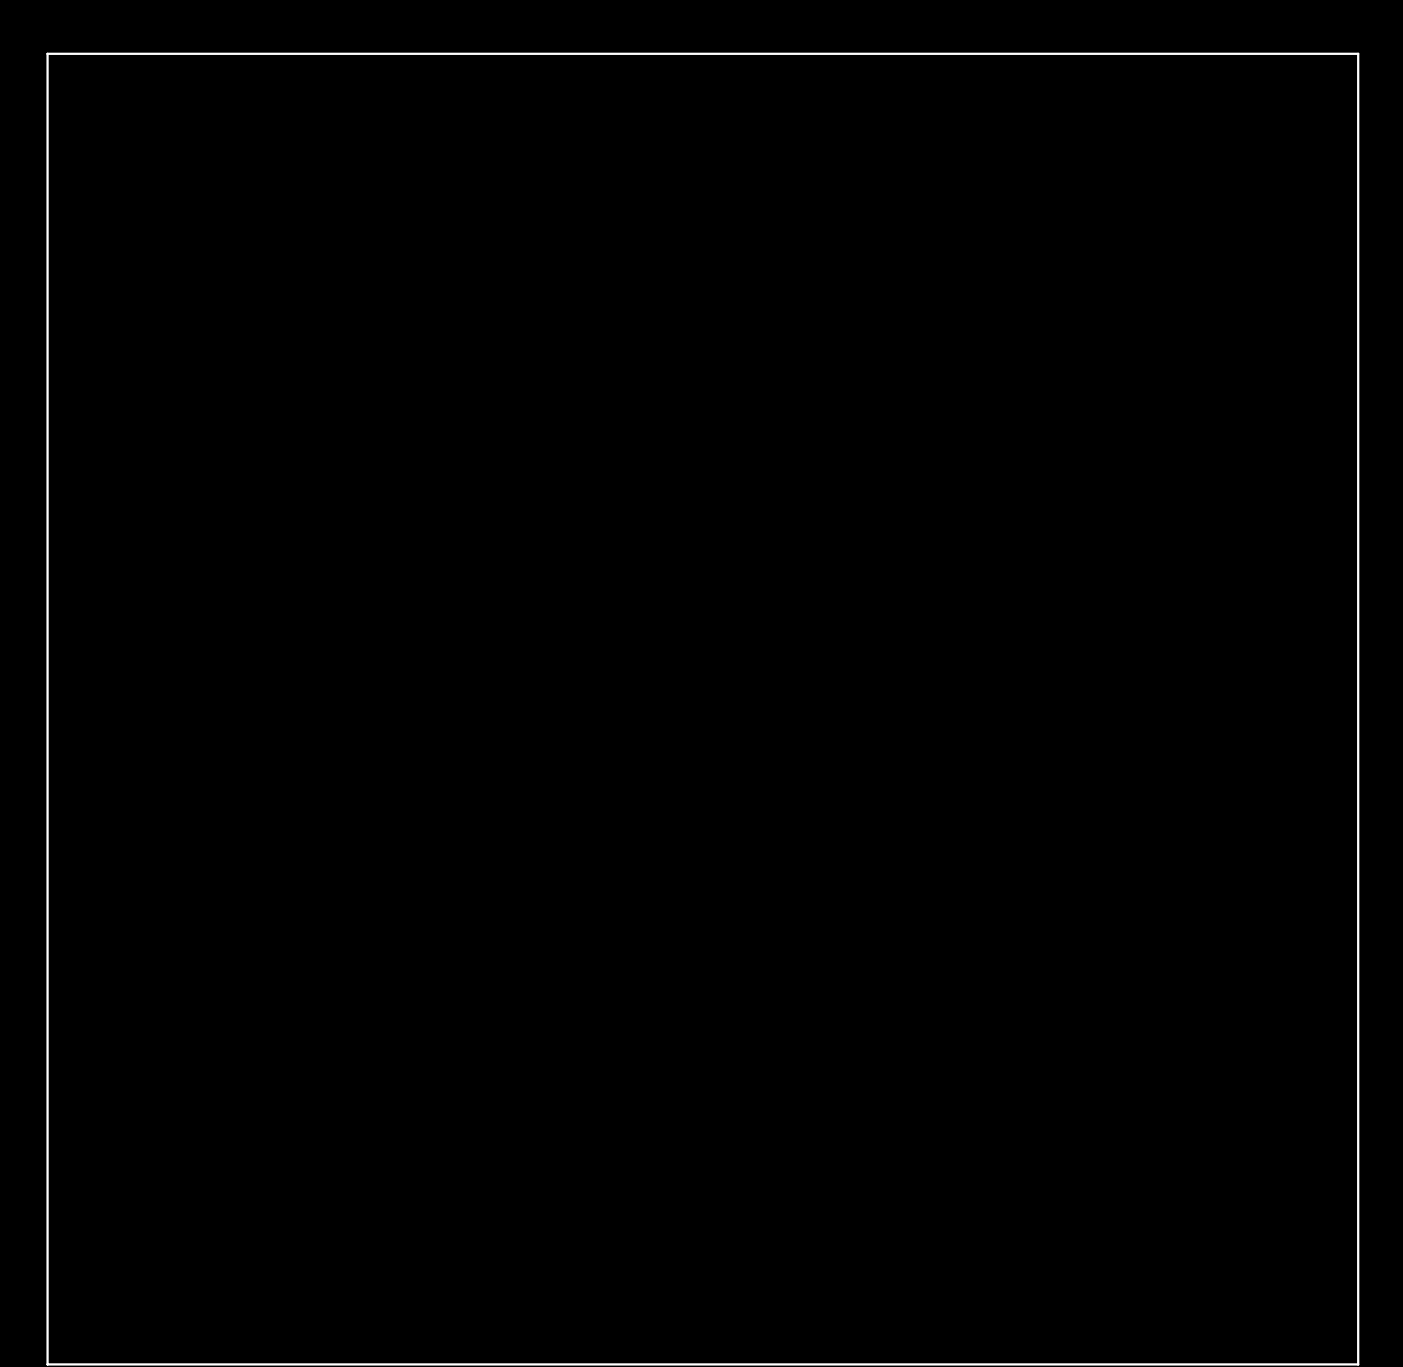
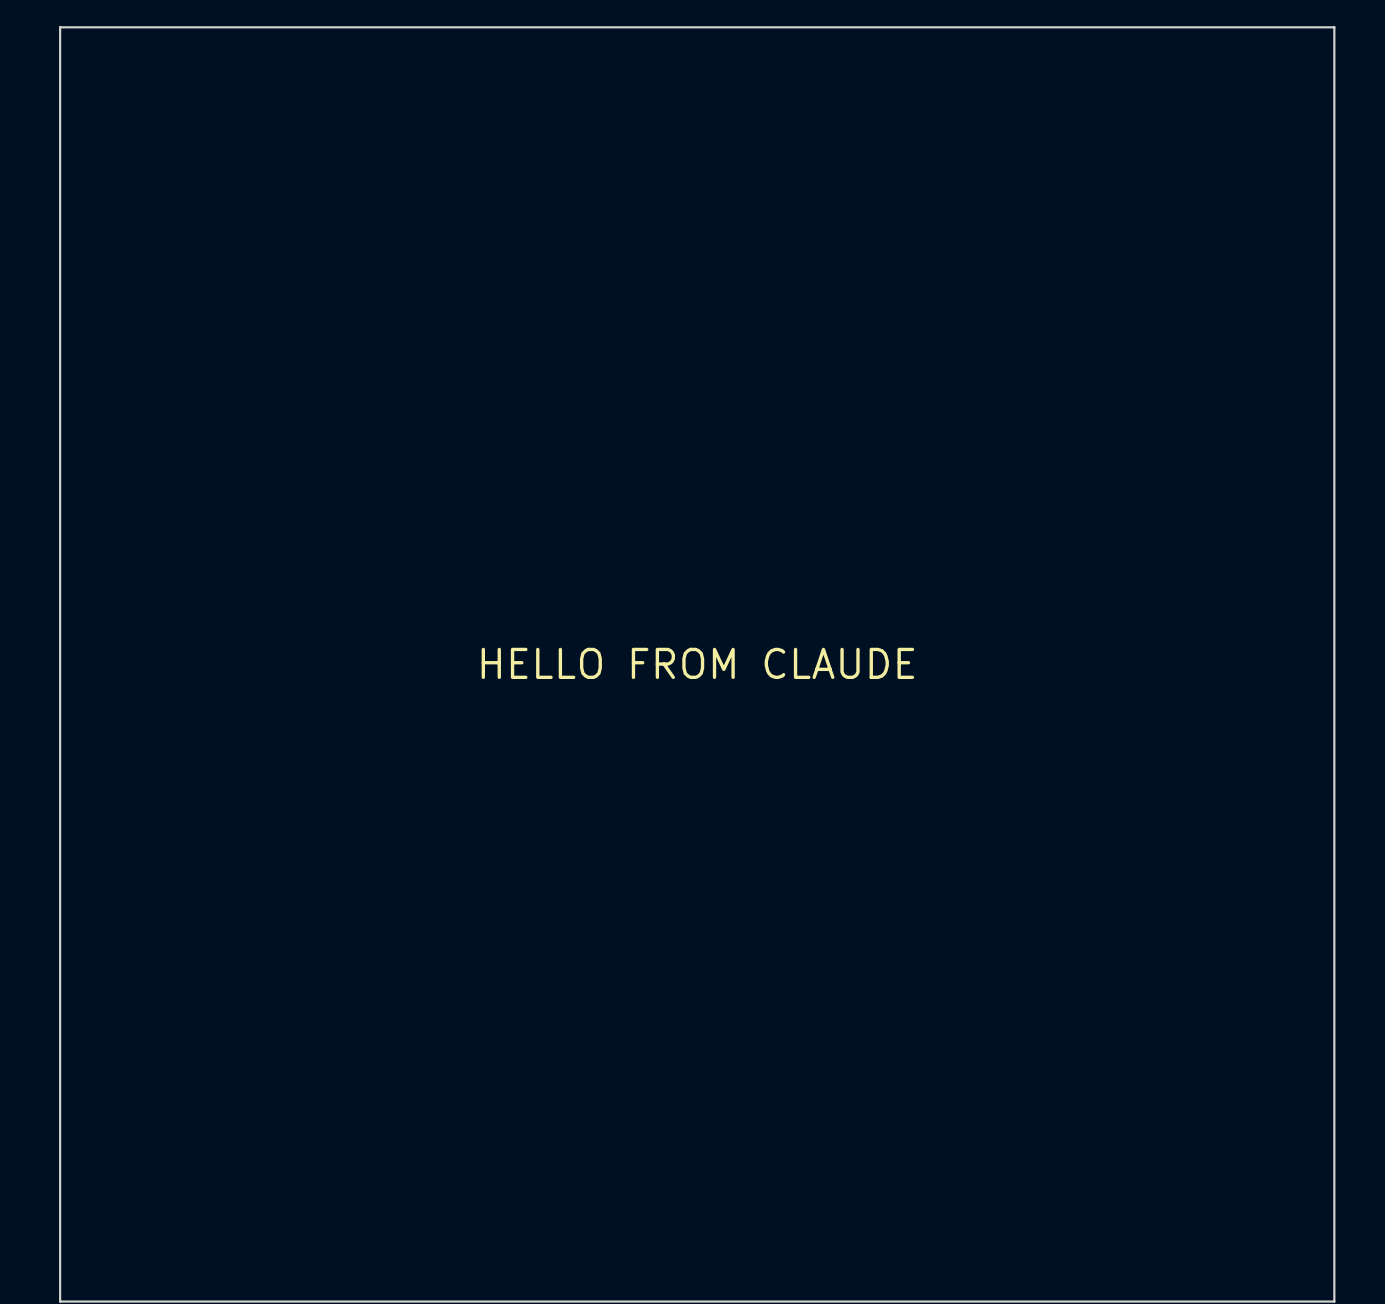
text: none -> HELLO FROM CLAUDE (697, 663)

